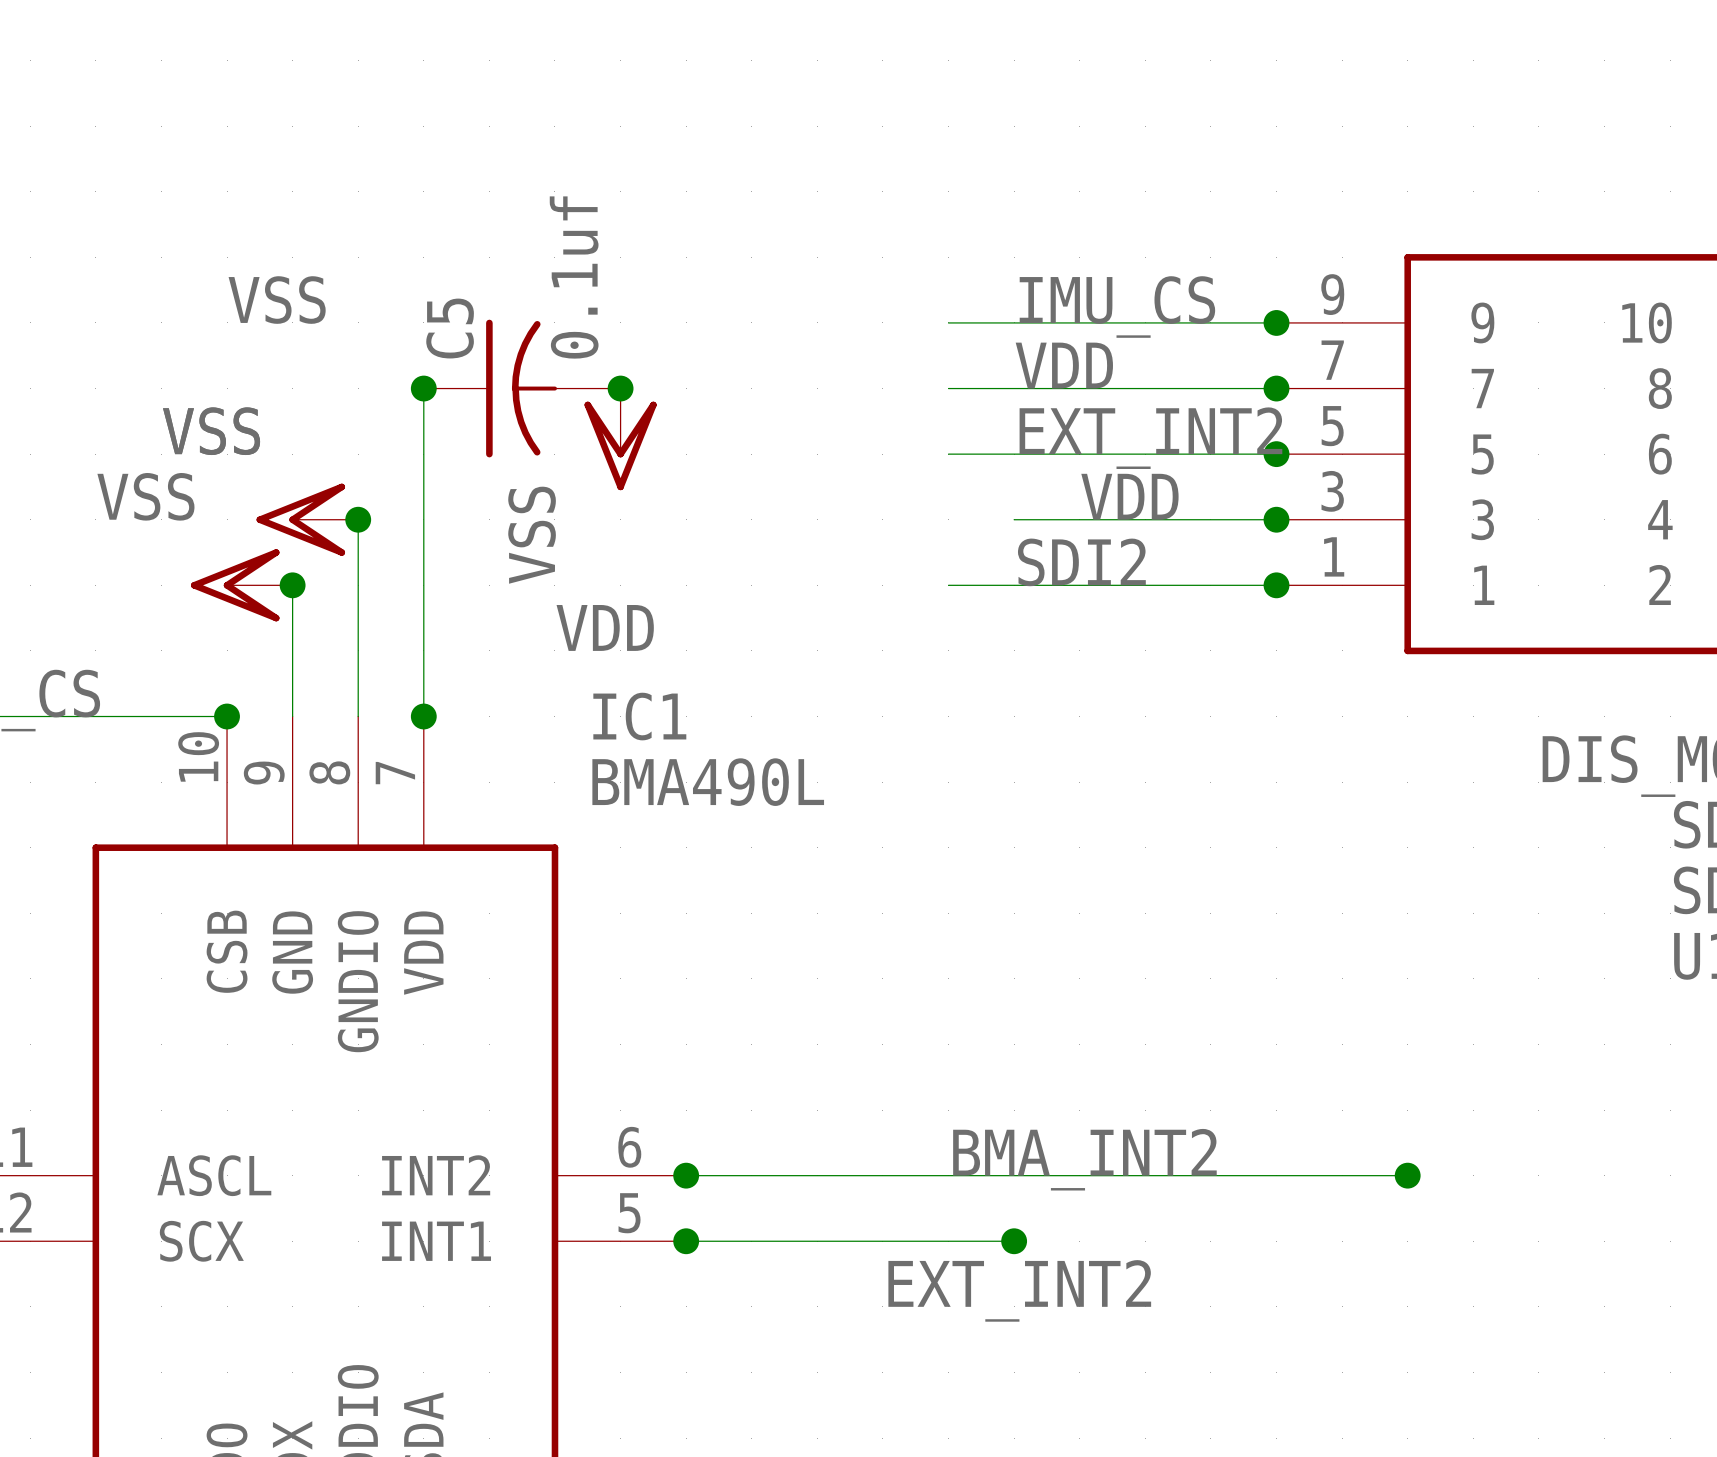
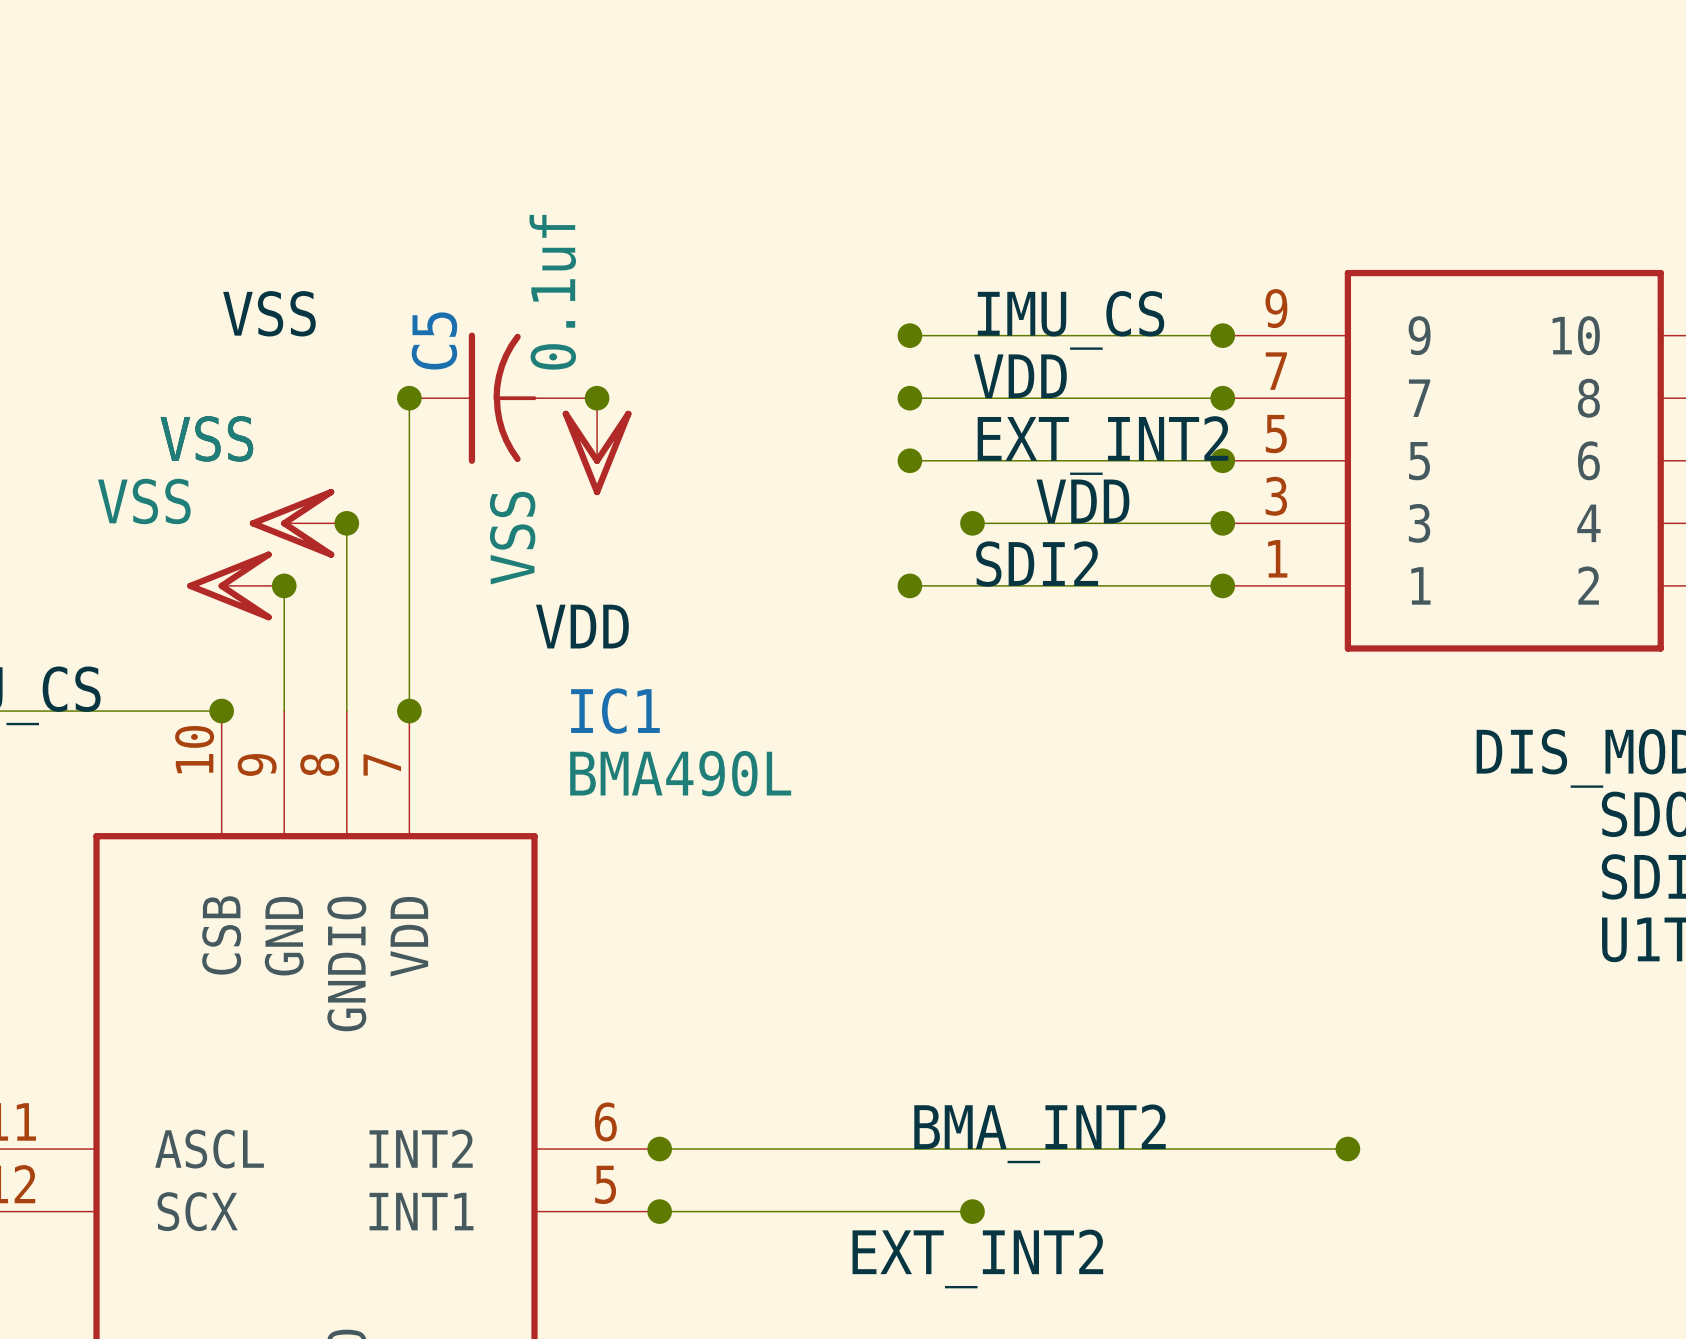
junction: none -> (909, 335)
junction: none -> (909, 398)
junction: none -> (909, 460)
junction: none -> (972, 523)
junction: none -> (909, 585)

